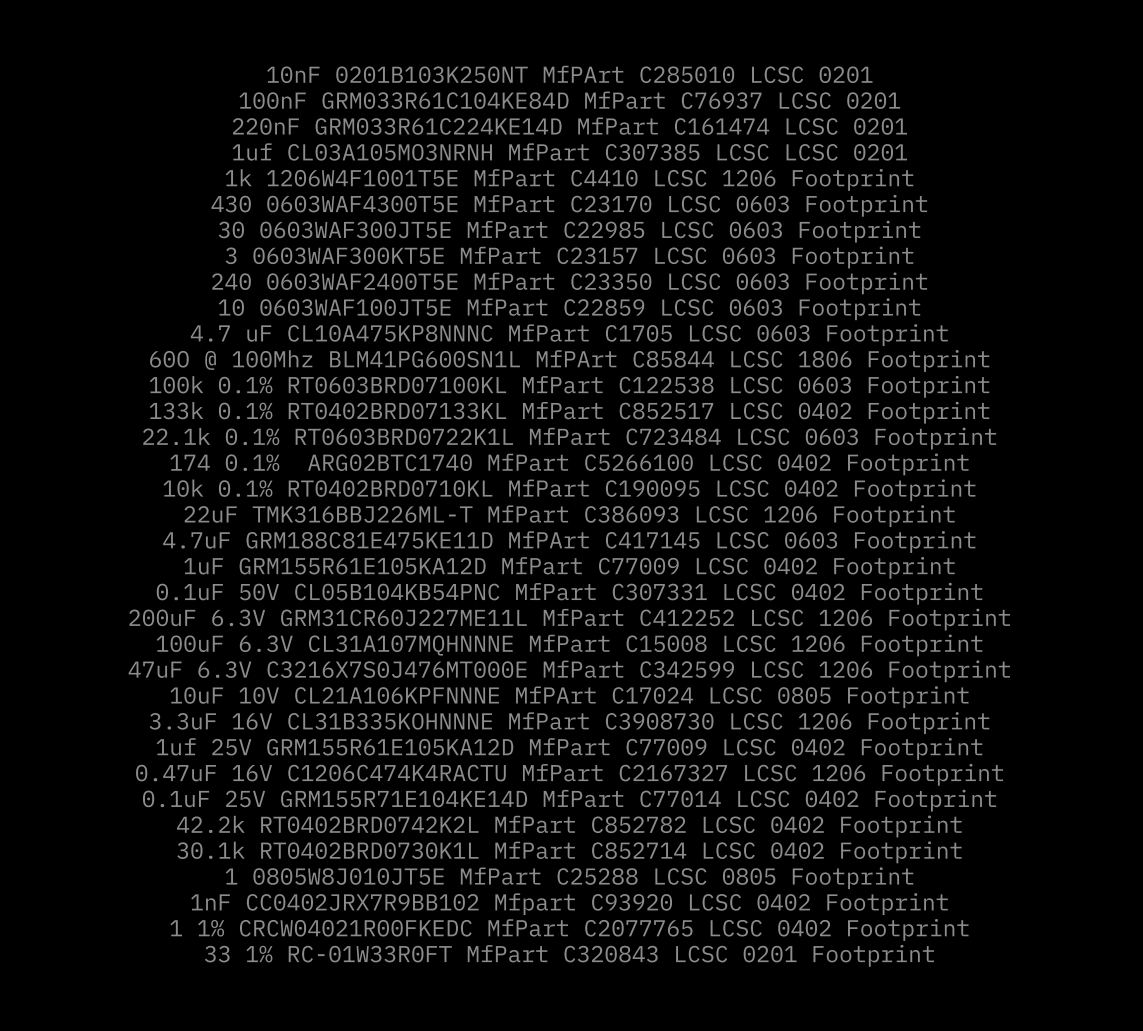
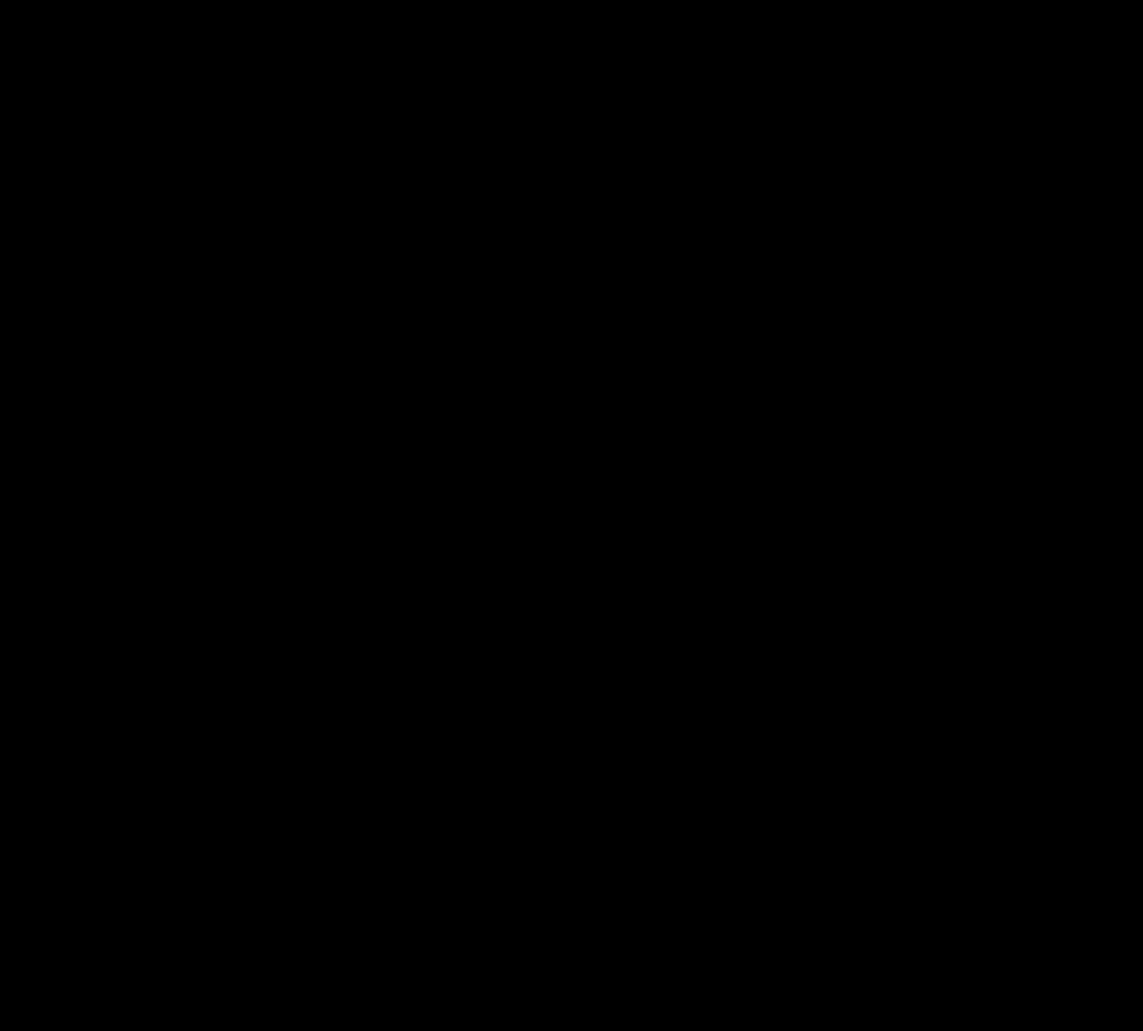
text: 10nF 0201B103K250NT MfPArt C285010 LCSC 0201 (569, 74) -> none
text: 100nF GRM033R61C104KE84D MfPart C76937 LCSC 0201 (569, 100) -> none
text: 220nF GRM033R61C224KE14D MfPart C161474 LCSC 0201 (569, 126) -> none
text: 1uf CL03A105MO3NRNH MfPart C307385 LCSC LCSC 0201 (569, 152) -> none
text: 1k 1206W4F1001T5E MfPart C4410 LCSC 1206 Footprint (569, 179) -> none
text: 430 0603WAF4300T5E MfPart C23170 LCSC 0603 Footprint (569, 205) -> none
text: 30 0603WAF300JT5E MfPart C22985 LCSC 0603 Footprint (569, 231) -> none
text: 3 0603WAF300KT5E MfPart C23157 LCSC 0603 Footprint (569, 257) -> none
text: 240 0603WAF2400T5E MfPart C23350 LCSC 0603 Footprint (569, 283) -> none
text: 10 0603WAF100JT5E MfPart C22859 LCSC 0603 Footprint (569, 309) -> none
text: 4.7 uF CL10A475KP8NNNC MfPart C1705 LCSC 0603 Footprint (569, 335) -> none
text: 60O @ 100Mhz BLM41PG600SN1L MfPArt C85844 LCSC 1806 Footprint (569, 360) -> none
text: 100k 0.1% RT0603BRD07100KL MfPart C122538 LCSC 0603 Footprint (569, 386) -> none
text: 133k 0.1% RT0402BRD07133KL MfPart C852517 LCSC 0402 Footprint (569, 412) -> none
text: 22.1k 0.1% RT0603BRD0722K1L MfPart C723484 LCSC 0603 Footprint (569, 438) -> none
text: 174 0.1% ARG02BTC1740 MfPart C5266100 LCSC 0402 Footprint (569, 464) -> none
text: 10k 0.1% RT0402BRD0710KL MfPart C190095 LCSC 0402 Footprint (569, 490) -> none
text: 22uF TMK316BBJ226ML-T MfPart C386093 LCSC 1206 Footprint (569, 516) -> none
text: 4.7uF GRM188C81E475KE11D MfPArt C417145 LCSC 0603 Footprint (569, 542) -> none
text: 1uF GRM155R61E105KA12D MfPart C77009 LCSC 0402 Footprint (569, 567) -> none
text: 0.1uF 50V CL05B104KB54PNC MfPart C307331 LCSC 0402 Footprint (569, 593) -> none
text: 200uF 6.3V GRM31CR60J227ME11L MfPart C412252 LCSC 1206 Footprint (569, 619) -> none
text: 100uF 6.3V CL31A107MQHNNNE MfPart C15008 LCSC 1206 Footprint (569, 645) -> none
text: 47uF 6.3V C3216X7S0J476MT000E MfPart C342599 LCSC 1206 Footprint (569, 671) -> none
text: 10uF 10V CL21A106KPFNNNE MfPArt C17024 LCSC 0805 Footprint (569, 697) -> none
text: 3.3uF 16V CL31B335KOHNNNE MfPart C3908730 LCSC 1206 Footprint (569, 723) -> none
text: 1uf 25V GRM155R61E105KA12D MfPart C77009 LCSC 0402 Footprint (569, 748) -> none
text: 0.47uF 16V C1206C474K4RACTU MfPart C2167327 LCSC 1206 Footprint (569, 774) -> none
text: 0.1uF 25V GRM155R71E104KE14D MfPart C77014 LCSC 0402 Footprint (569, 800) -> none
text: 42.2k RT0402BRD0742K2L MfPart C852782 LCSC 0402 Footprint (569, 826) -> none
text: 30.1k RT0402BRD0730K1L MfPart C852714 LCSC 0402 Footprint (569, 852) -> none
text: 1 0805W8J010JT5E MfPart C25288 LCSC 0805 Footprint (569, 878) -> none
text: 1nF CC0402JRX7R9BB102 Mfpart C93920 LCSC 0402 Footprint (569, 904) -> none
text: 1 1% CRCW04021R00FKEDC MfPart C2077765 LCSC 0402 Footprint (569, 929) -> none
text: 33 1% RC-01W33R0FT MfPart C320843 LCSC 0201 Footprint (569, 955) -> none

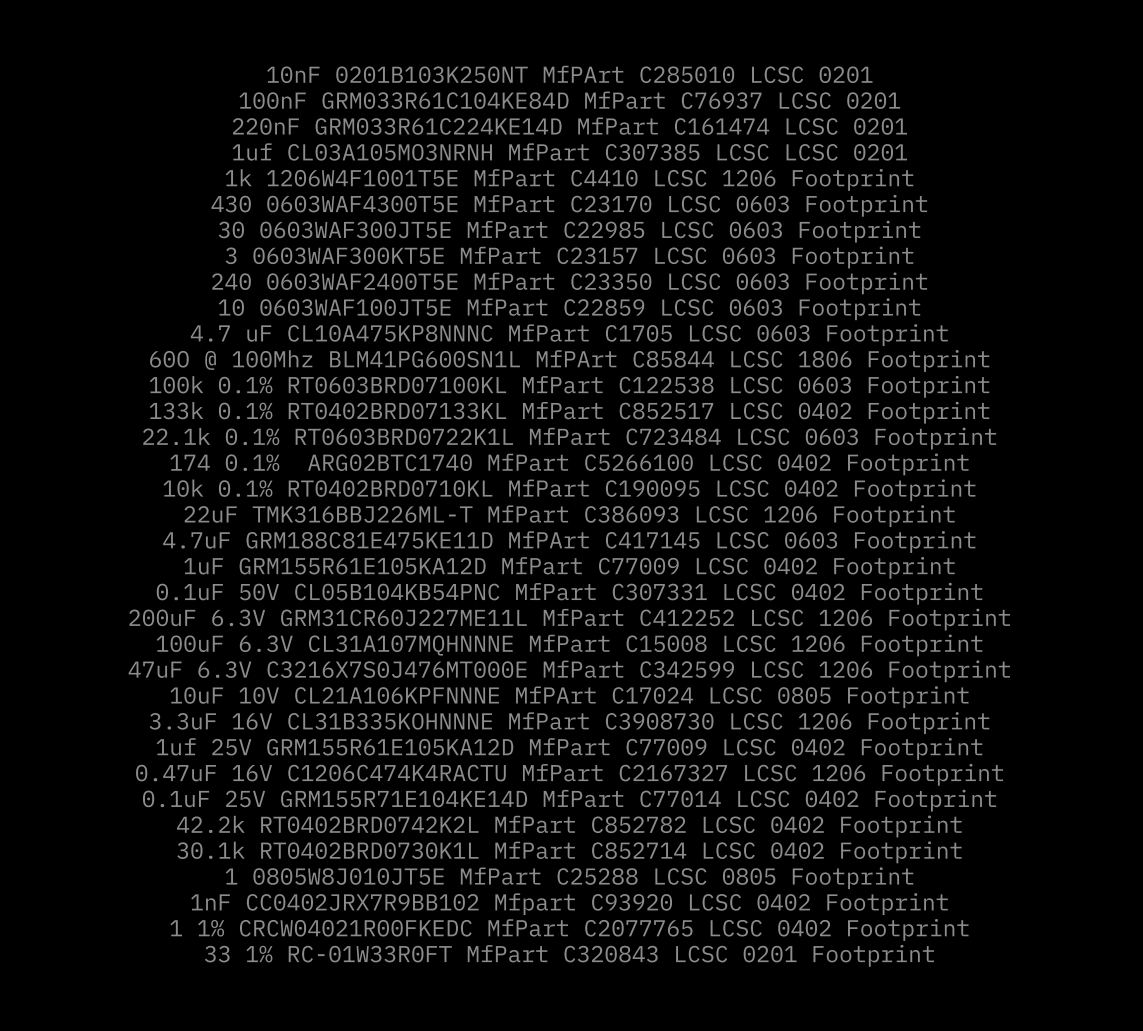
text: none -> 10nF 0201B103K250NT MfPArt C285010 LCSC 0201 (569, 74)
text: none -> 100nF GRM033R61C104KE84D MfPart C76937 LCSC 0201 (569, 100)
text: none -> 220nF GRM033R61C224KE14D MfPart C161474 LCSC 0201 (569, 126)
text: none -> 1uf CL03A105MO3NRNH MfPart C307385 LCSC LCSC 0201 (569, 152)
text: none -> 1k 1206W4F1001T5E MfPart C4410 LCSC 1206 Footprint (569, 179)
text: none -> 430 0603WAF4300T5E MfPart C23170 LCSC 0603 Footprint (569, 205)
text: none -> 30 0603WAF300JT5E MfPart C22985 LCSC 0603 Footprint (569, 231)
text: none -> 3 0603WAF300KT5E MfPart C23157 LCSC 0603 Footprint (569, 257)
text: none -> 240 0603WAF2400T5E MfPart C23350 LCSC 0603 Footprint (569, 283)
text: none -> 10 0603WAF100JT5E MfPart C22859 LCSC 0603 Footprint (569, 309)
text: none -> 4.7 uF CL10A475KP8NNNC MfPart C1705 LCSC 0603 Footprint (569, 335)
text: none -> 60O @ 100Mhz BLM41PG600SN1L MfPArt C85844 LCSC 1806 Footprint (569, 360)
text: none -> 100k 0.1% RT0603BRD07100KL MfPart C122538 LCSC 0603 Footprint (569, 386)
text: none -> 133k 0.1% RT0402BRD07133KL MfPart C852517 LCSC 0402 Footprint (569, 412)
text: none -> 22.1k 0.1% RT0603BRD0722K1L MfPart C723484 LCSC 0603 Footprint (569, 438)
text: none -> 174 0.1% ARG02BTC1740 MfPart C5266100 LCSC 0402 Footprint (569, 464)
text: none -> 10k 0.1% RT0402BRD0710KL MfPart C190095 LCSC 0402 Footprint (569, 490)
text: none -> 22uF TMK316BBJ226ML-T MfPart C386093 LCSC 1206 Footprint (569, 516)
text: none -> 4.7uF GRM188C81E475KE11D MfPArt C417145 LCSC 0603 Footprint (569, 542)
text: none -> 1uF GRM155R61E105KA12D MfPart C77009 LCSC 0402 Footprint (569, 567)
text: none -> 0.1uF 50V CL05B104KB54PNC MfPart C307331 LCSC 0402 Footprint (569, 593)
text: none -> 200uF 6.3V GRM31CR60J227ME11L MfPart C412252 LCSC 1206 Footprint (569, 619)
text: none -> 100uF 6.3V CL31A107MQHNNNE MfPart C15008 LCSC 1206 Footprint (569, 645)
text: none -> 47uF 6.3V C3216X7S0J476MT000E MfPart C342599 LCSC 1206 Footprint (569, 671)
text: none -> 10uF 10V CL21A106KPFNNNE MfPArt C17024 LCSC 0805 Footprint (569, 697)
text: none -> 3.3uF 16V CL31B335KOHNNNE MfPart C3908730 LCSC 1206 Footprint (569, 723)
text: none -> 1uf 25V GRM155R61E105KA12D MfPart C77009 LCSC 0402 Footprint (569, 748)
text: none -> 0.47uF 16V C1206C474K4RACTU MfPart C2167327 LCSC 1206 Footprint (569, 774)
text: none -> 0.1uF 25V GRM155R71E104KE14D MfPart C77014 LCSC 0402 Footprint (569, 800)
text: none -> 42.2k RT0402BRD0742K2L MfPart C852782 LCSC 0402 Footprint (569, 826)
text: none -> 30.1k RT0402BRD0730K1L MfPart C852714 LCSC 0402 Footprint (569, 852)
text: none -> 1 0805W8J010JT5E MfPart C25288 LCSC 0805 Footprint (569, 878)
text: none -> 1nF CC0402JRX7R9BB102 Mfpart C93920 LCSC 0402 Footprint (569, 904)
text: none -> 1 1% CRCW04021R00FKEDC MfPart C2077765 LCSC 0402 Footprint (569, 929)
text: none -> 33 1% RC-01W33R0FT MfPart C320843 LCSC 0201 Footprint (569, 955)

